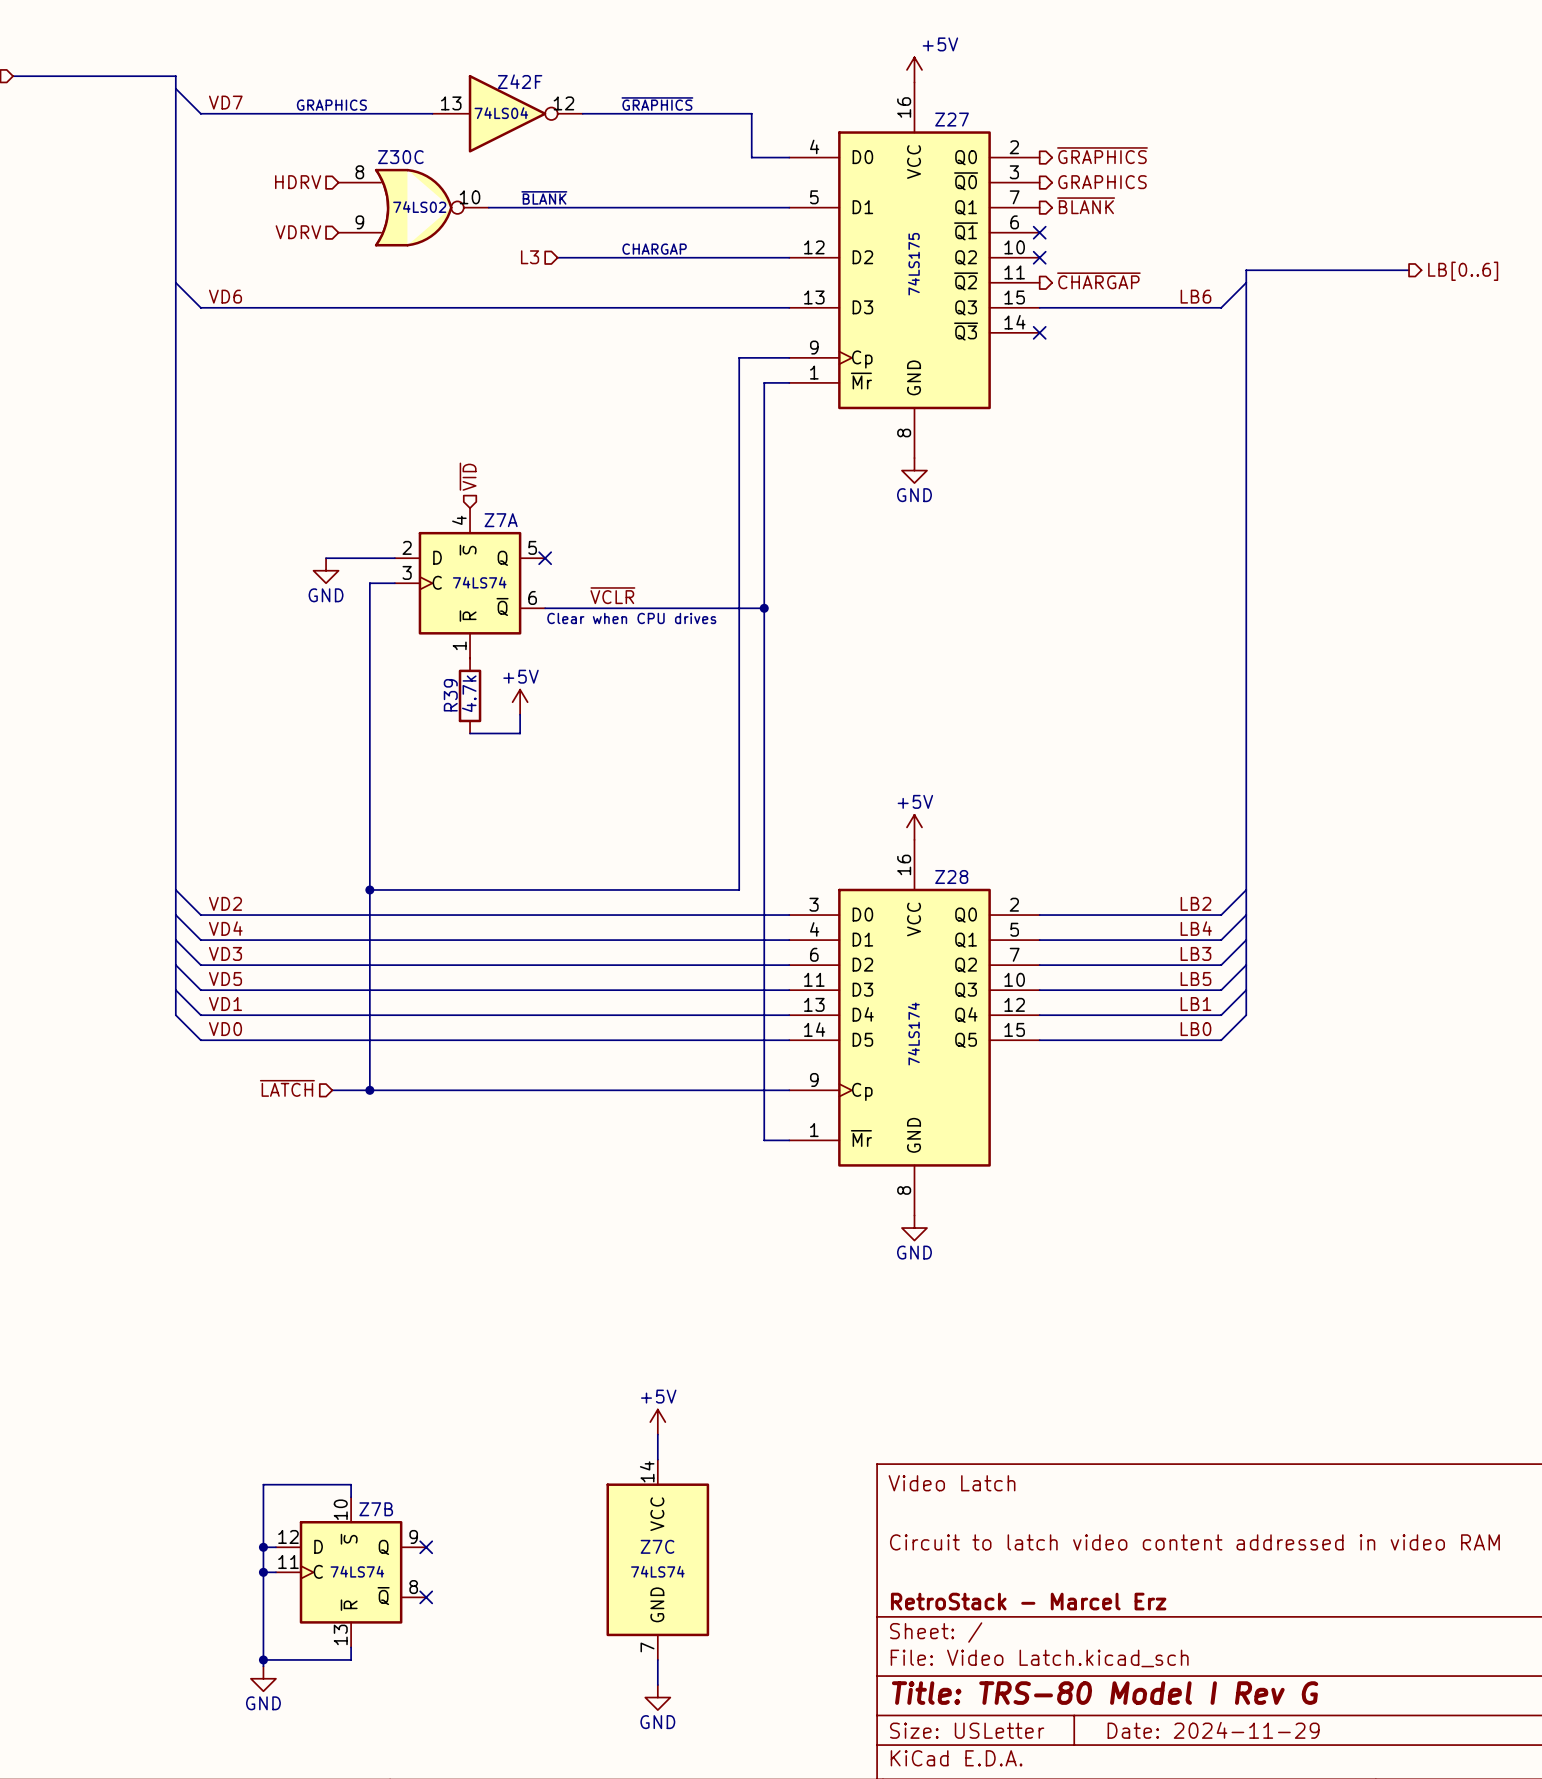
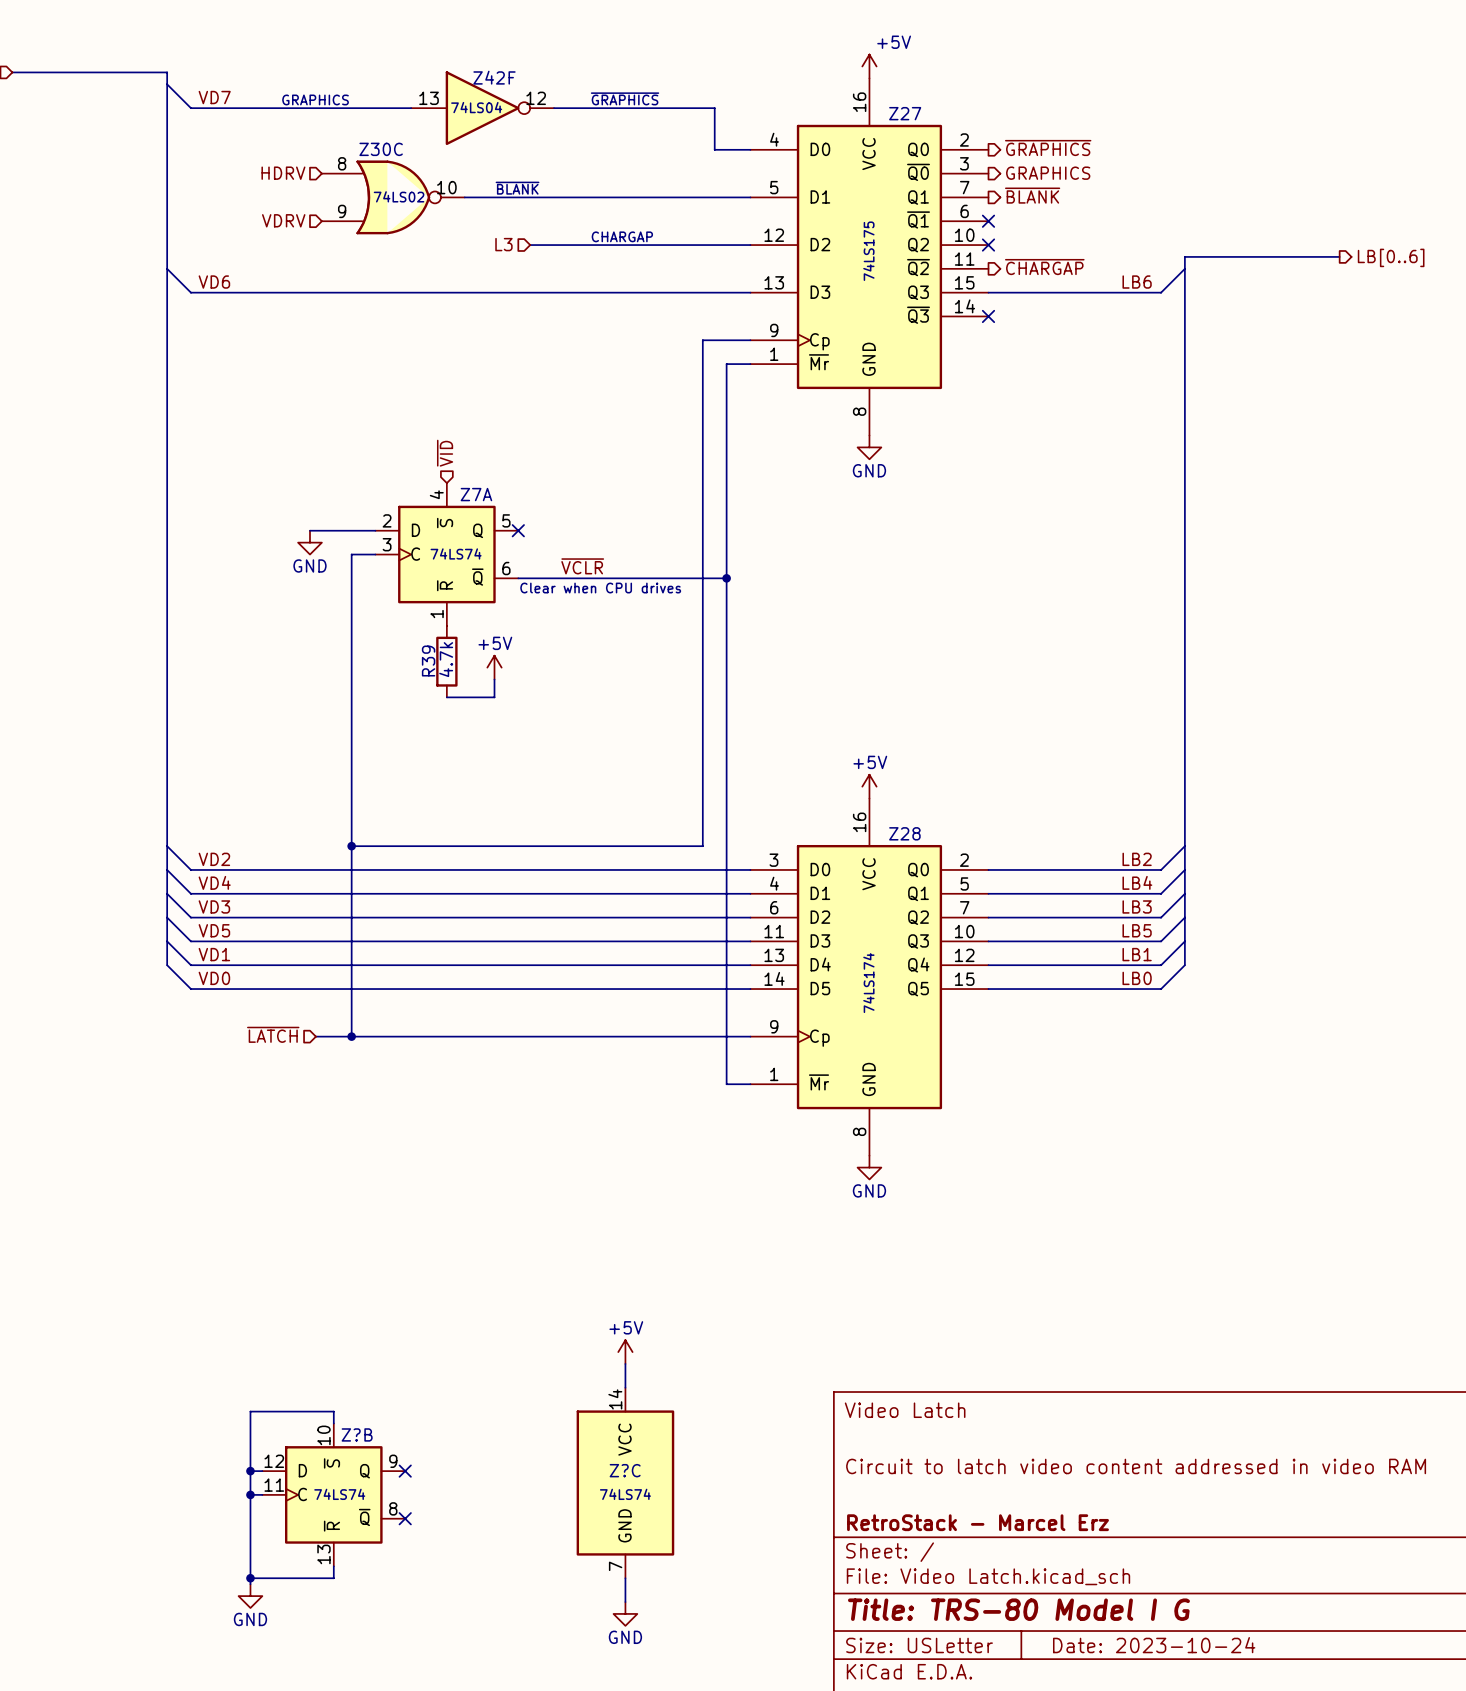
Z7B name: Z7B (376, 1509) -> Z?B (357, 1434)
Z7C name: Z7C (657, 1546) -> Z?C (625, 1470)
title block: Title: TRS-80 Model I Rev G (1105, 1693) -> Title: TRS-80 Model I G (1018, 1609)
title block: Date: 2024-11-29 (1213, 1730) -> Date: 2023-10-24 (1154, 1645)

